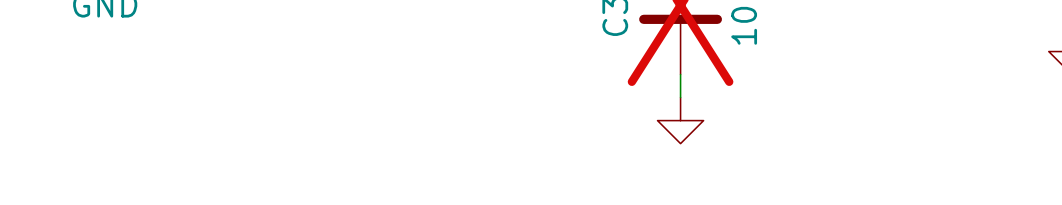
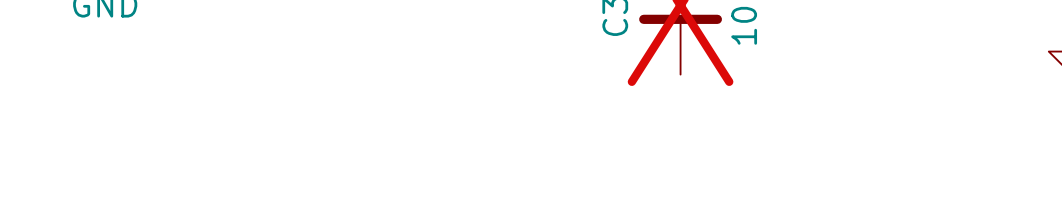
wire: (680, 74) (680, 97) -> none
power symbol: (680, 120) -> none

